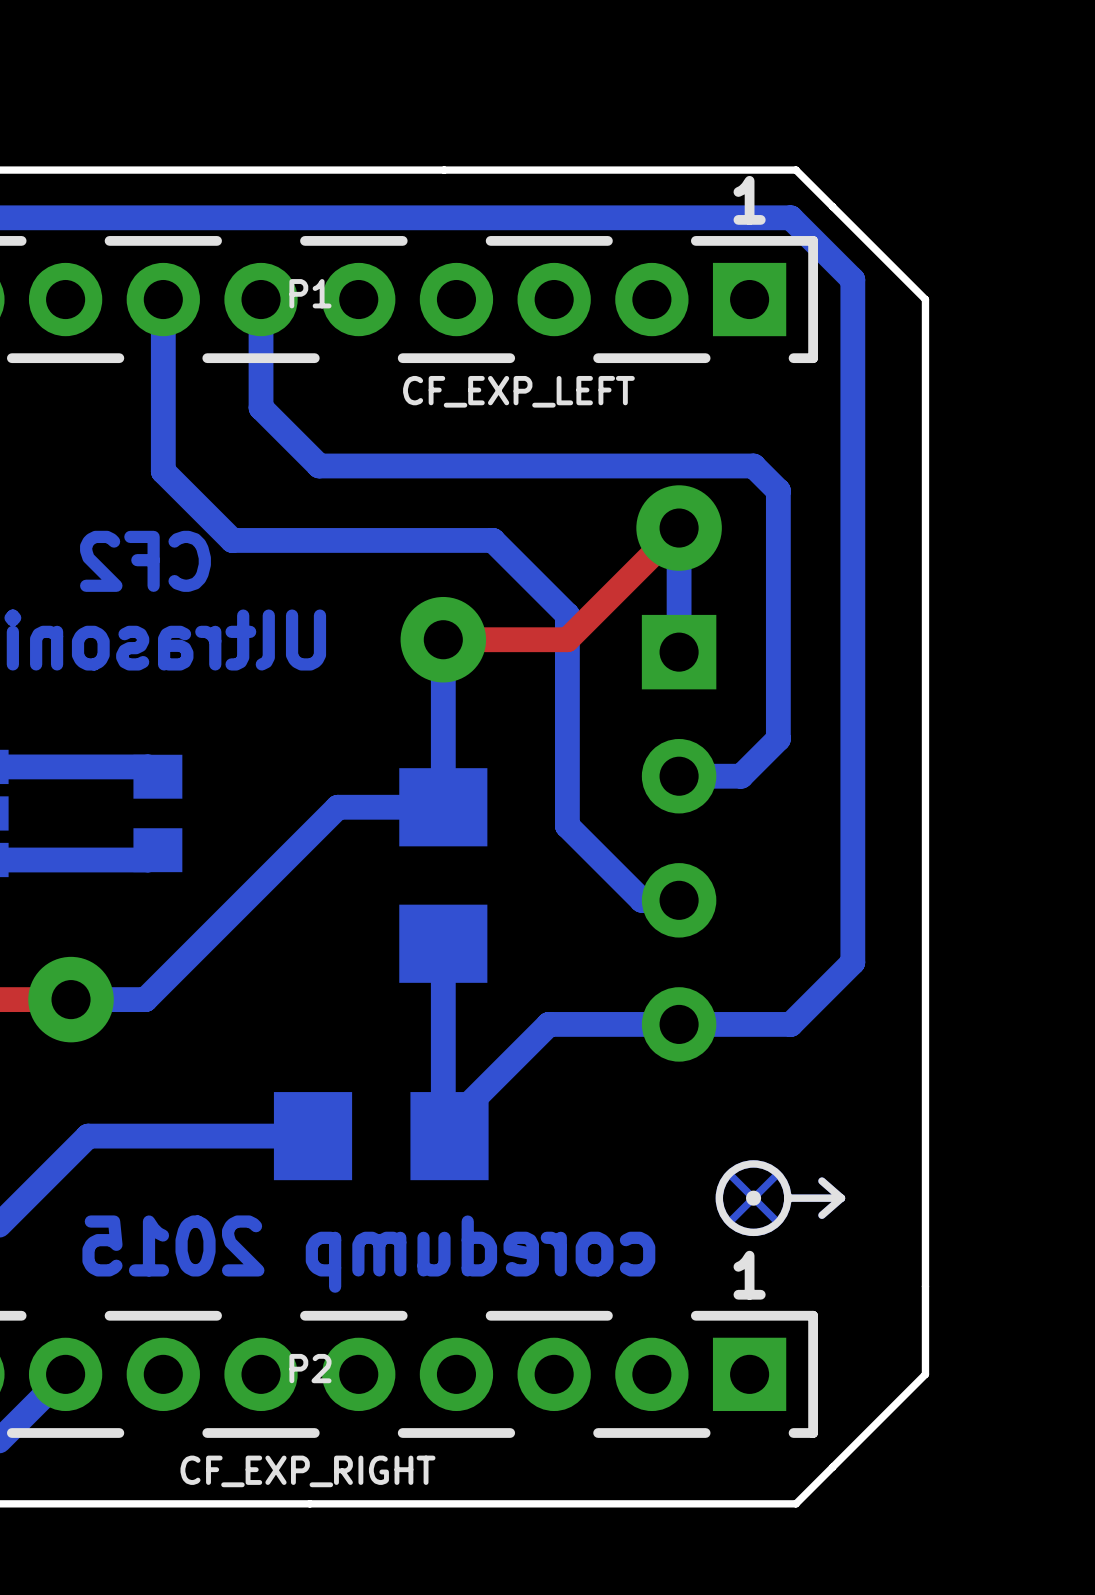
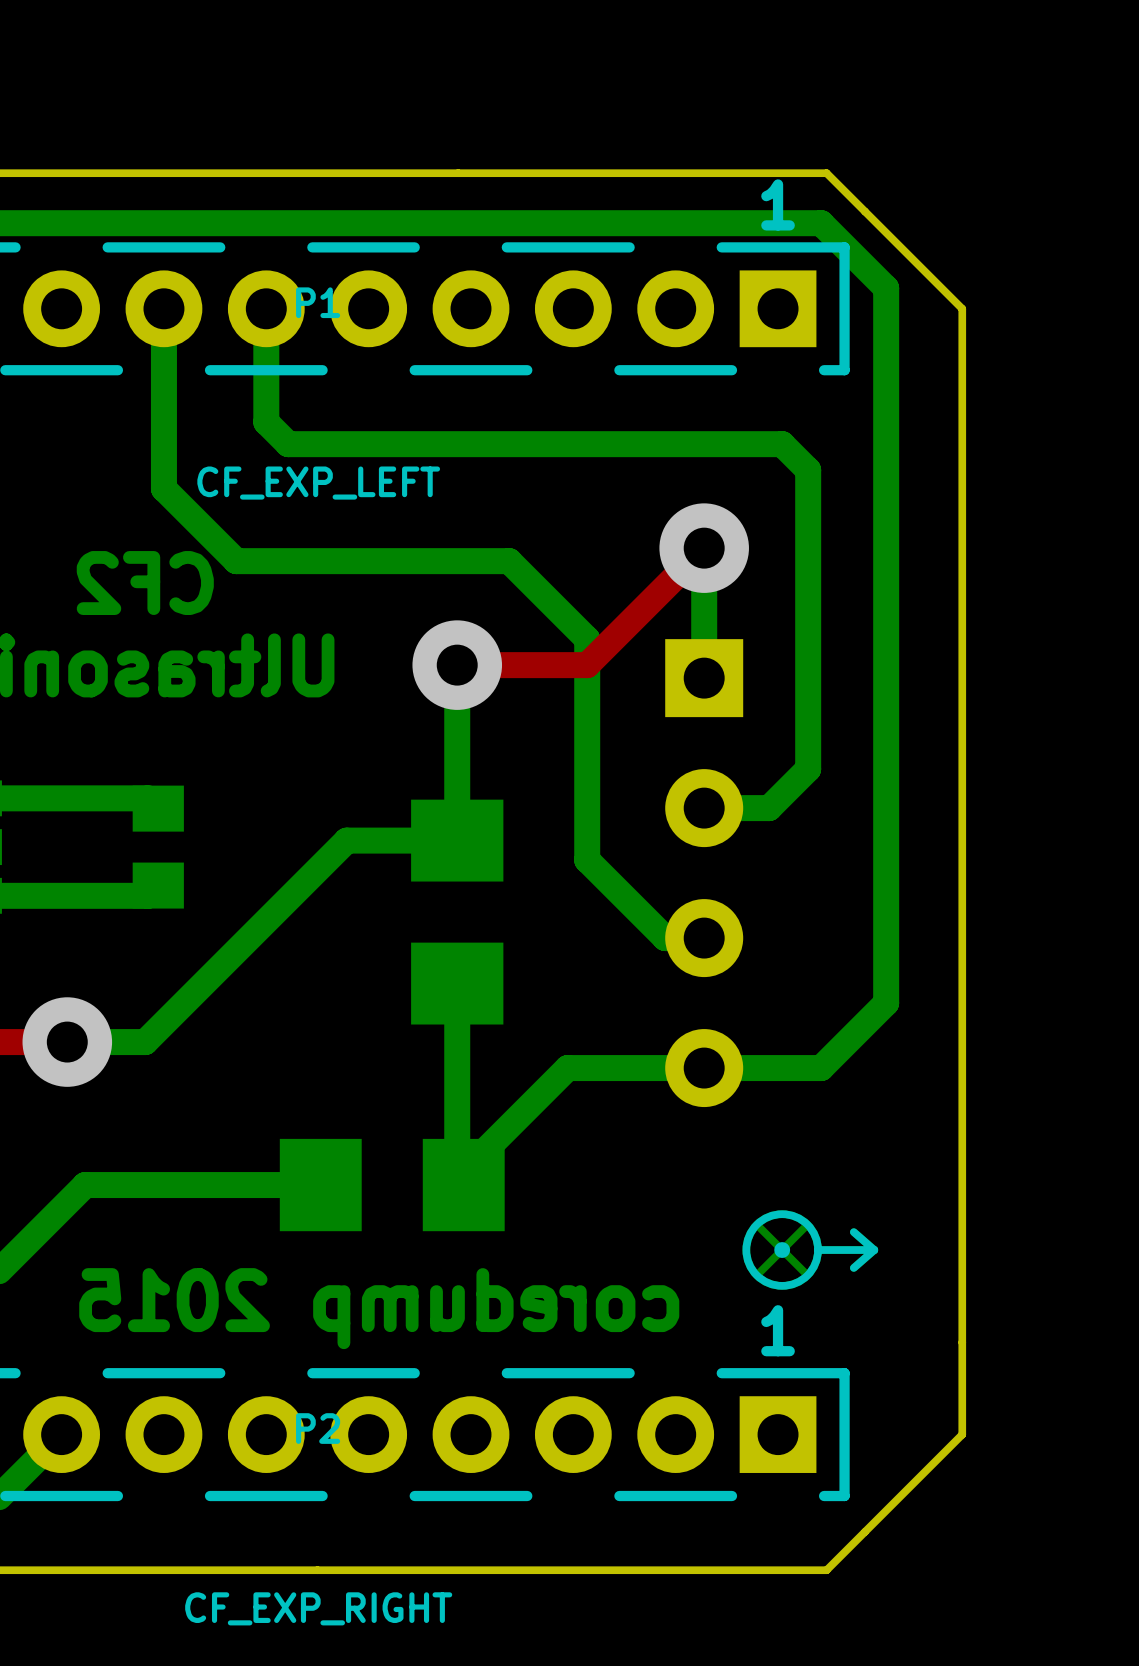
P1 value position: CF_EXP_LEFT (518, 391) -> CF_EXP_LEFT (318, 483)
bottom track: (281, 428) (319, 465) (753, 465) (778, 490) -> (288, 444) (782, 444) (808, 470) (808, 509)
P2 value position: CF_EXP_RIGHT (307, 1471) -> CF_EXP_RIGHT (318, 1608)

